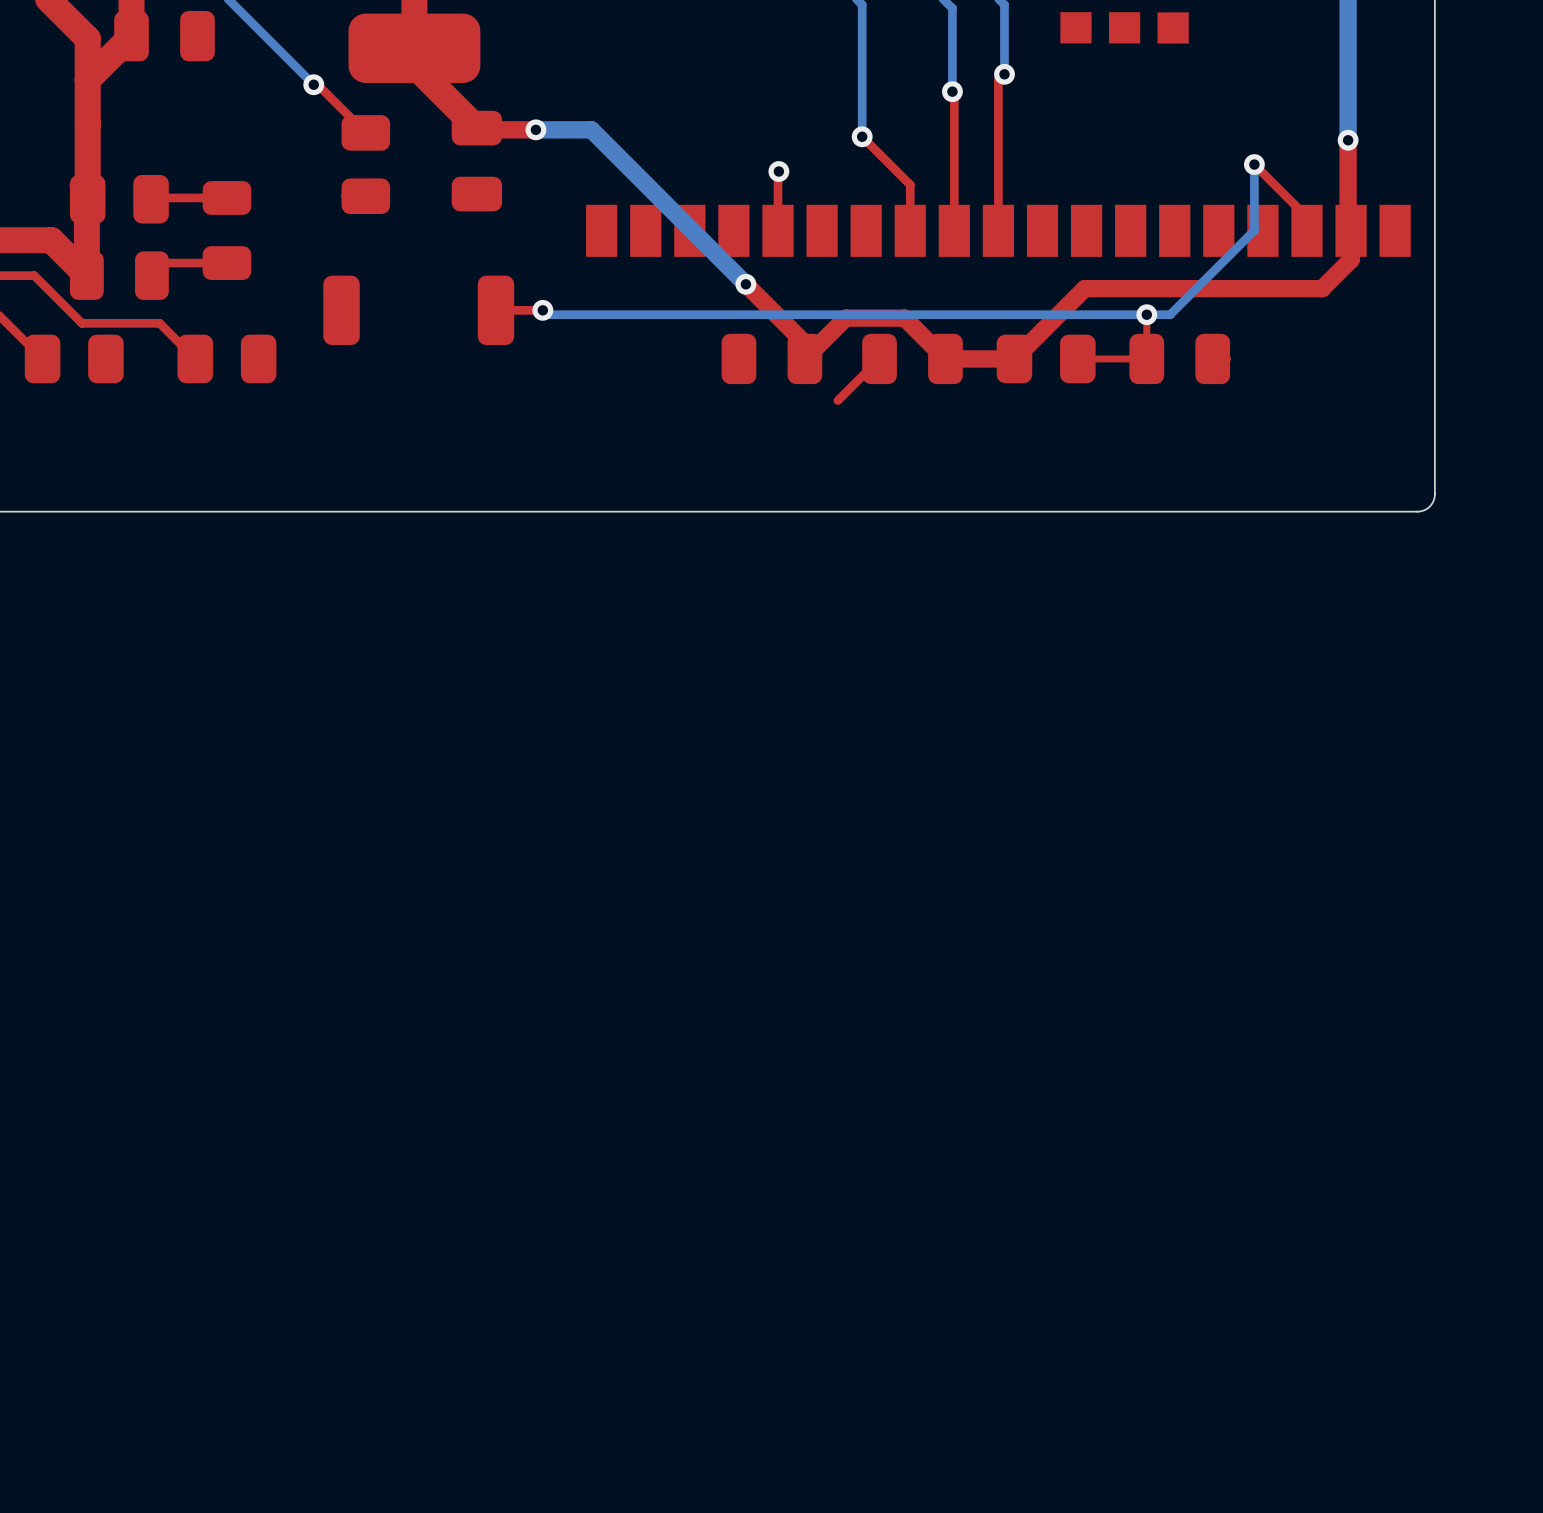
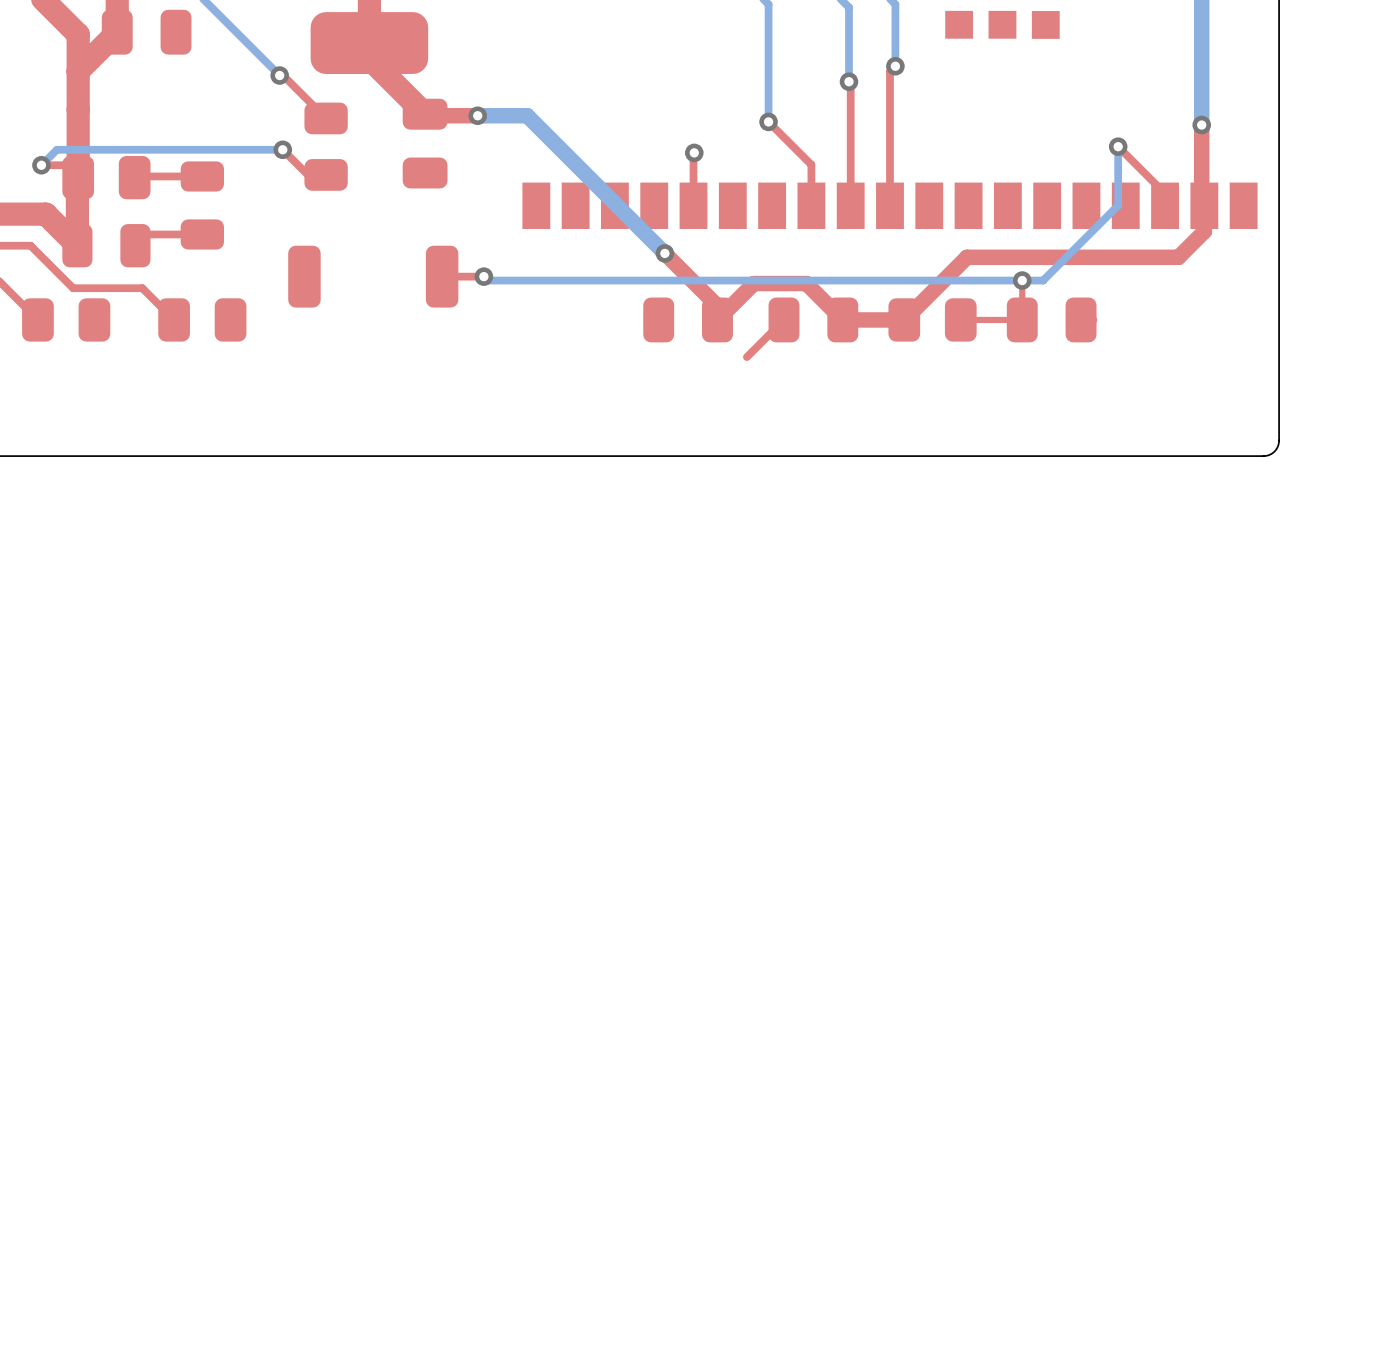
top track: none -> (282, 149) (307, 174)
bottom track: none -> (282, 149) (56, 149) (41, 165)
via: none -> (282, 149)
via: none -> (41, 165)
top track: none -> (65, 165) (41, 165)

